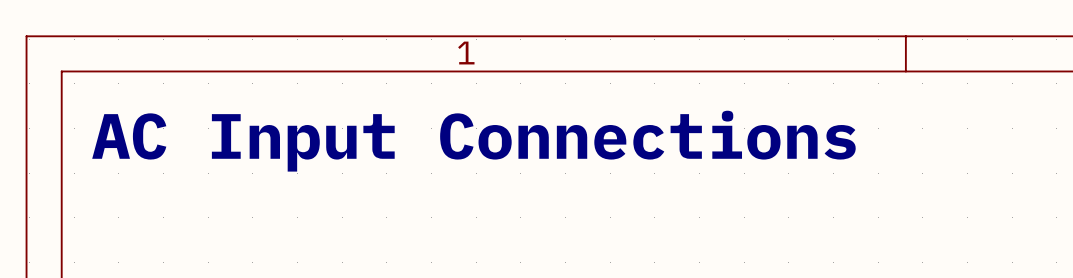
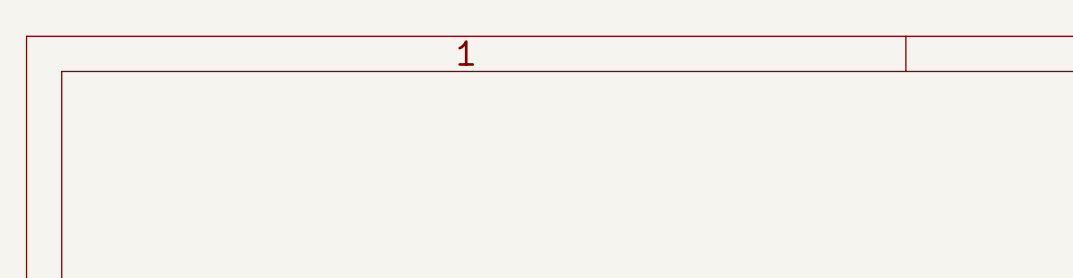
text: AC Input Connections (473, 141) -> none

